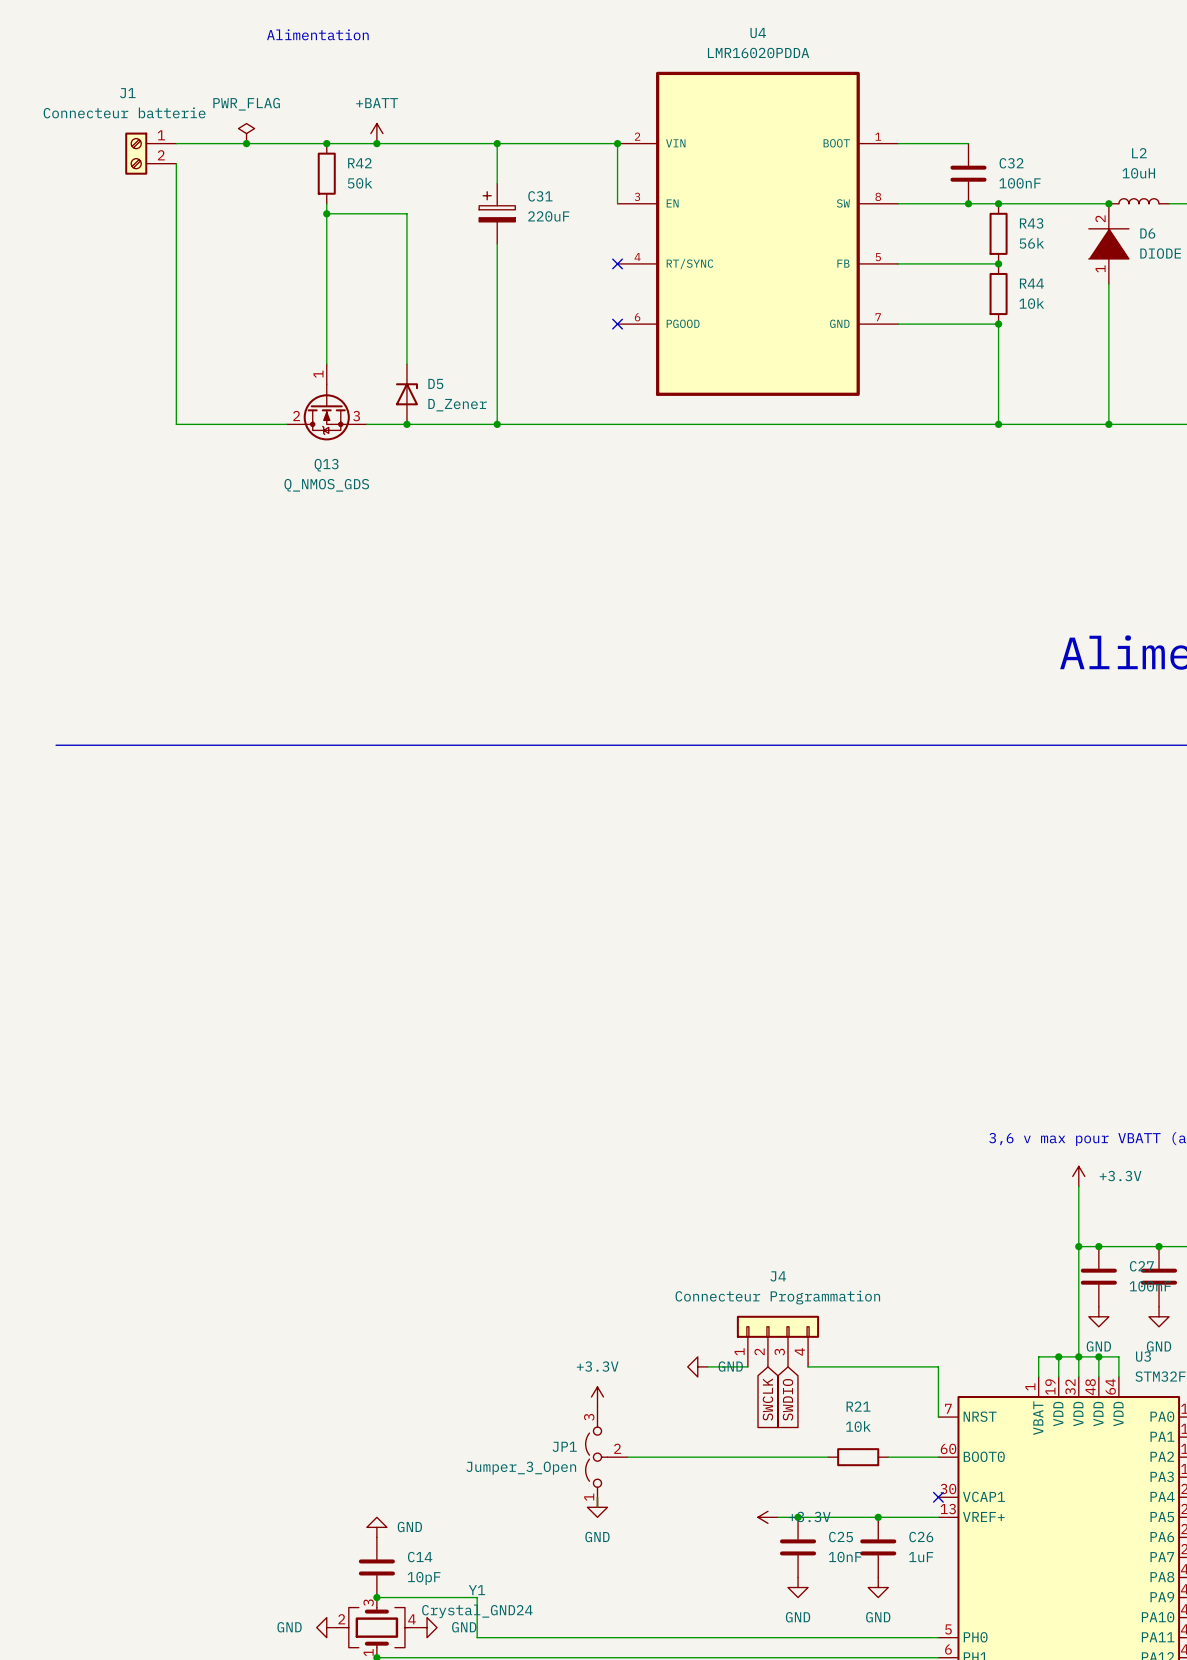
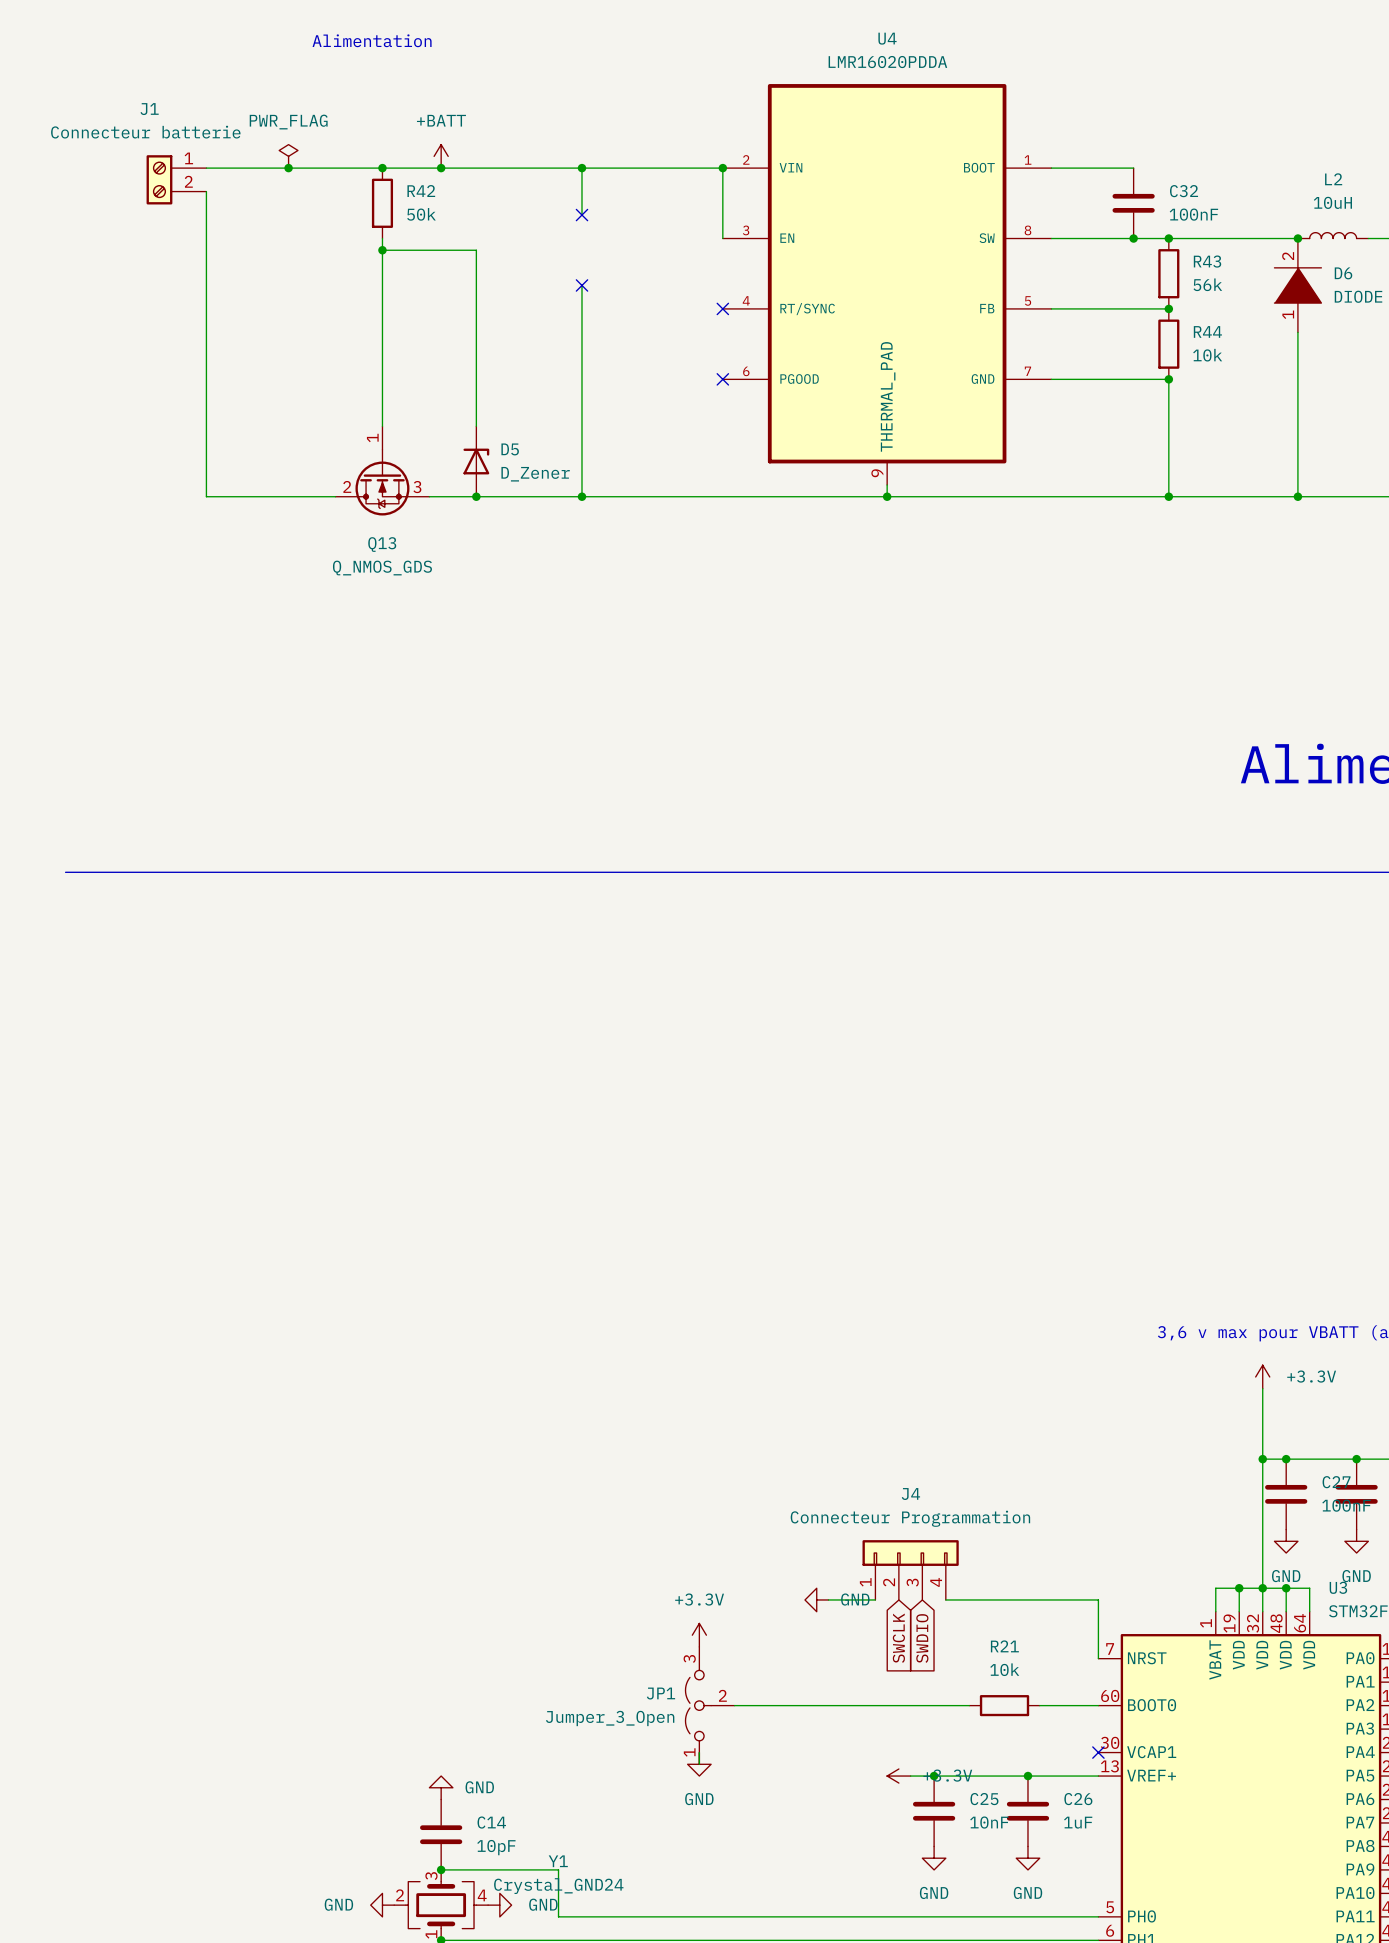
U4 symbol: [617, 71, 899, 396] -> [722, 84, 1052, 485]
no-connect mark: none -> (581, 215)
C31: 220uF (497, 213) -> none
no-connect mark: none -> (581, 285)
wire: none -> (887, 484) (887, 496)
junction: none -> (887, 496)

